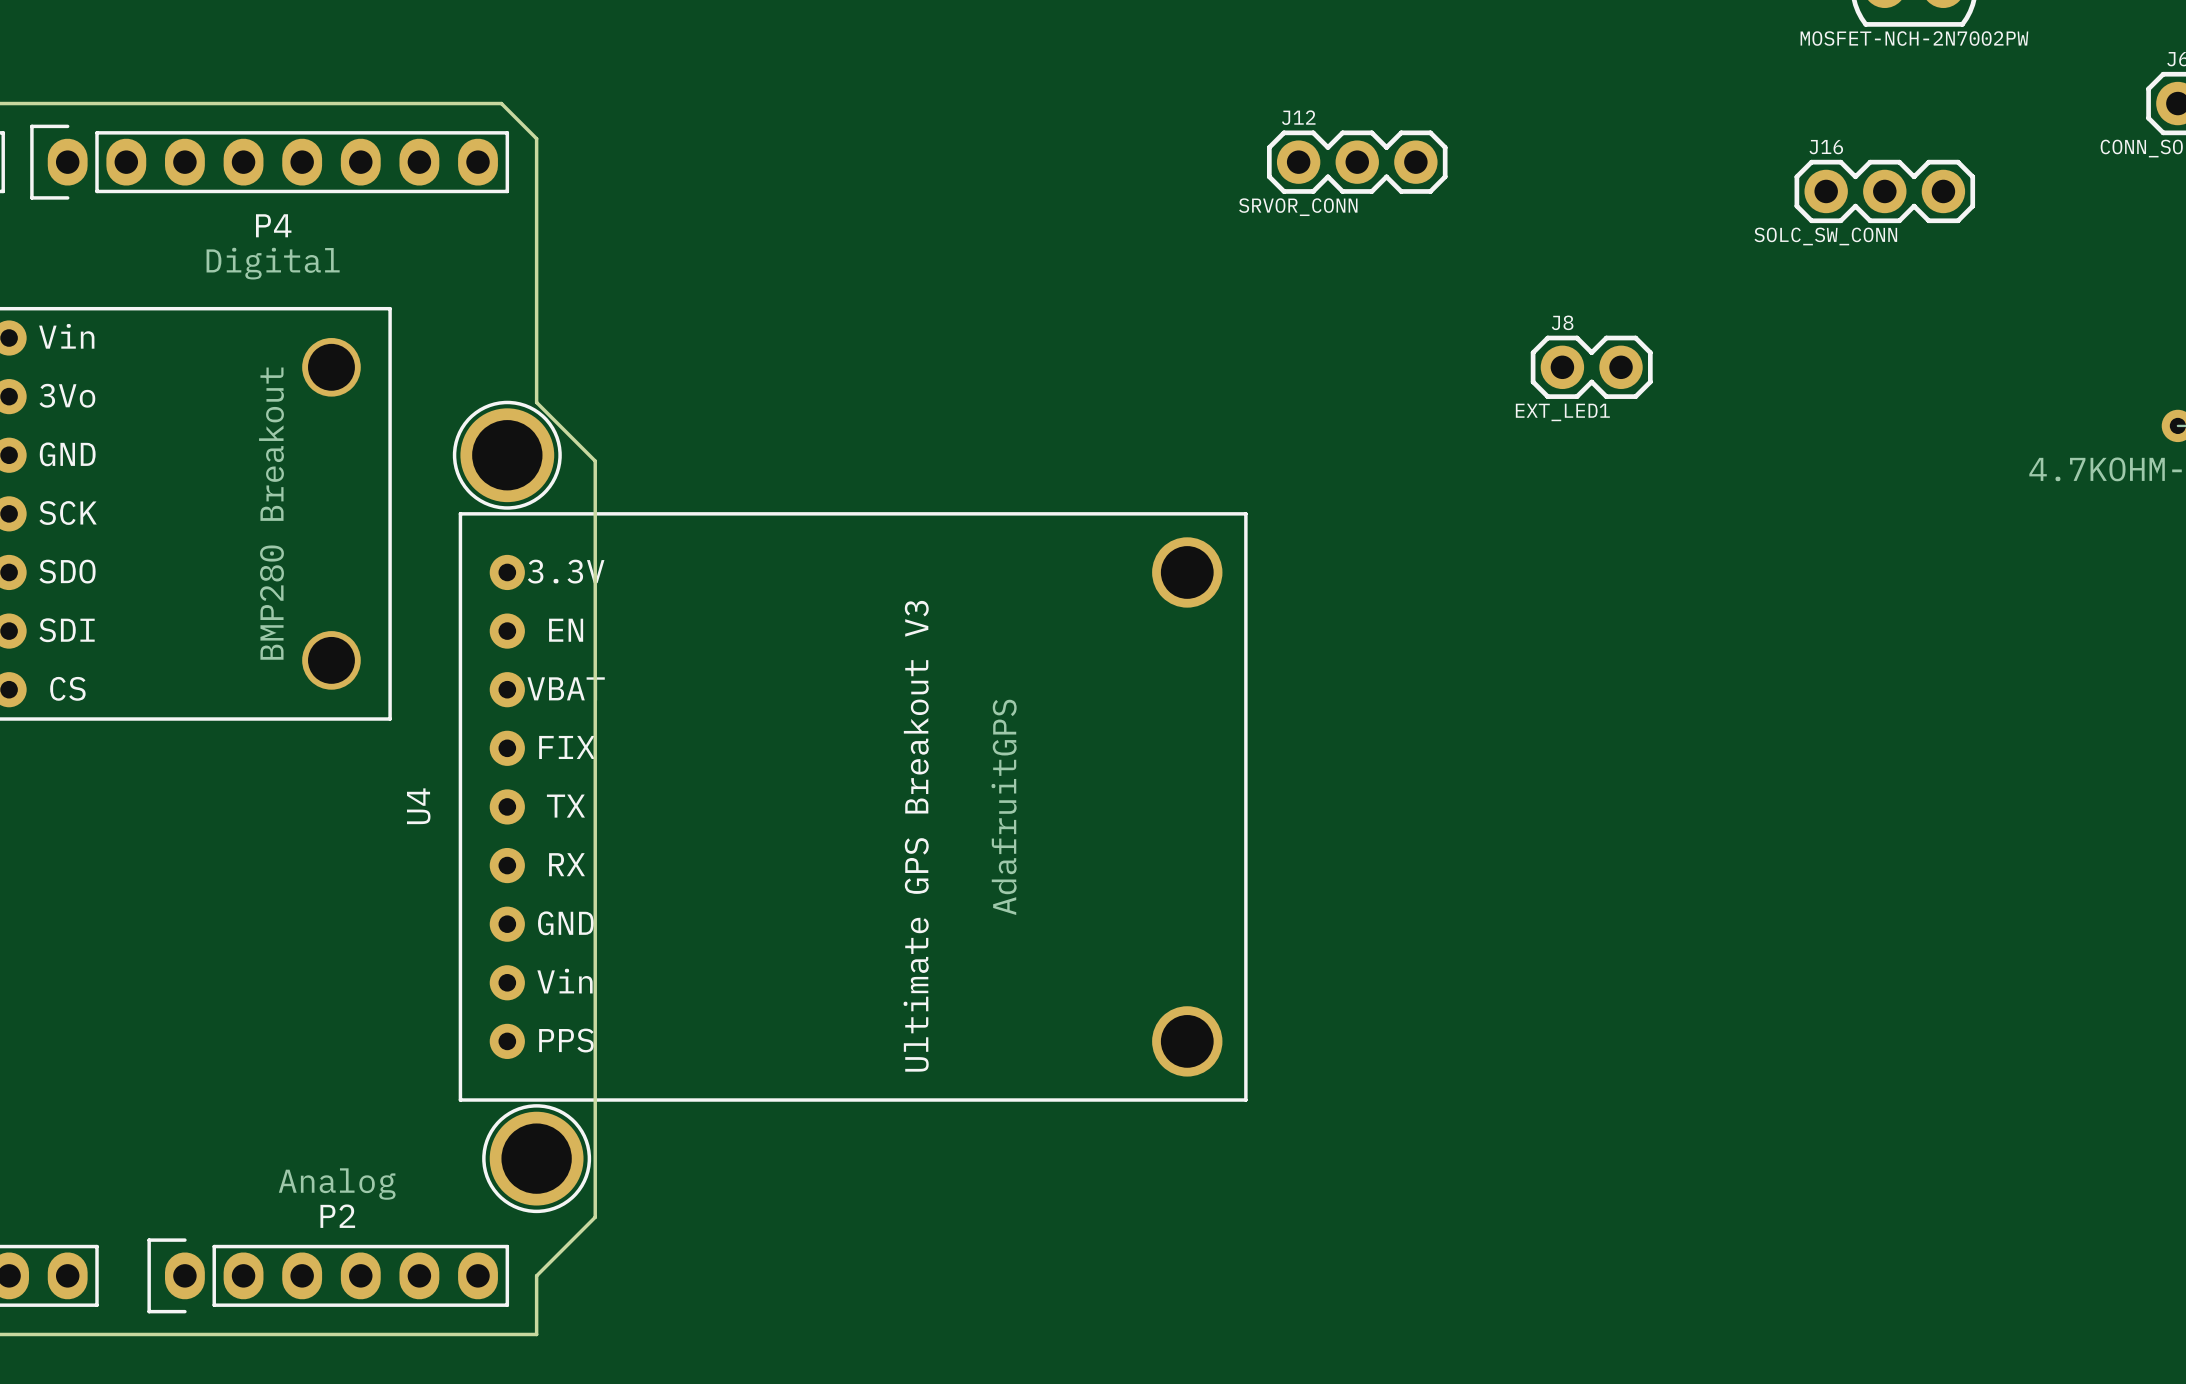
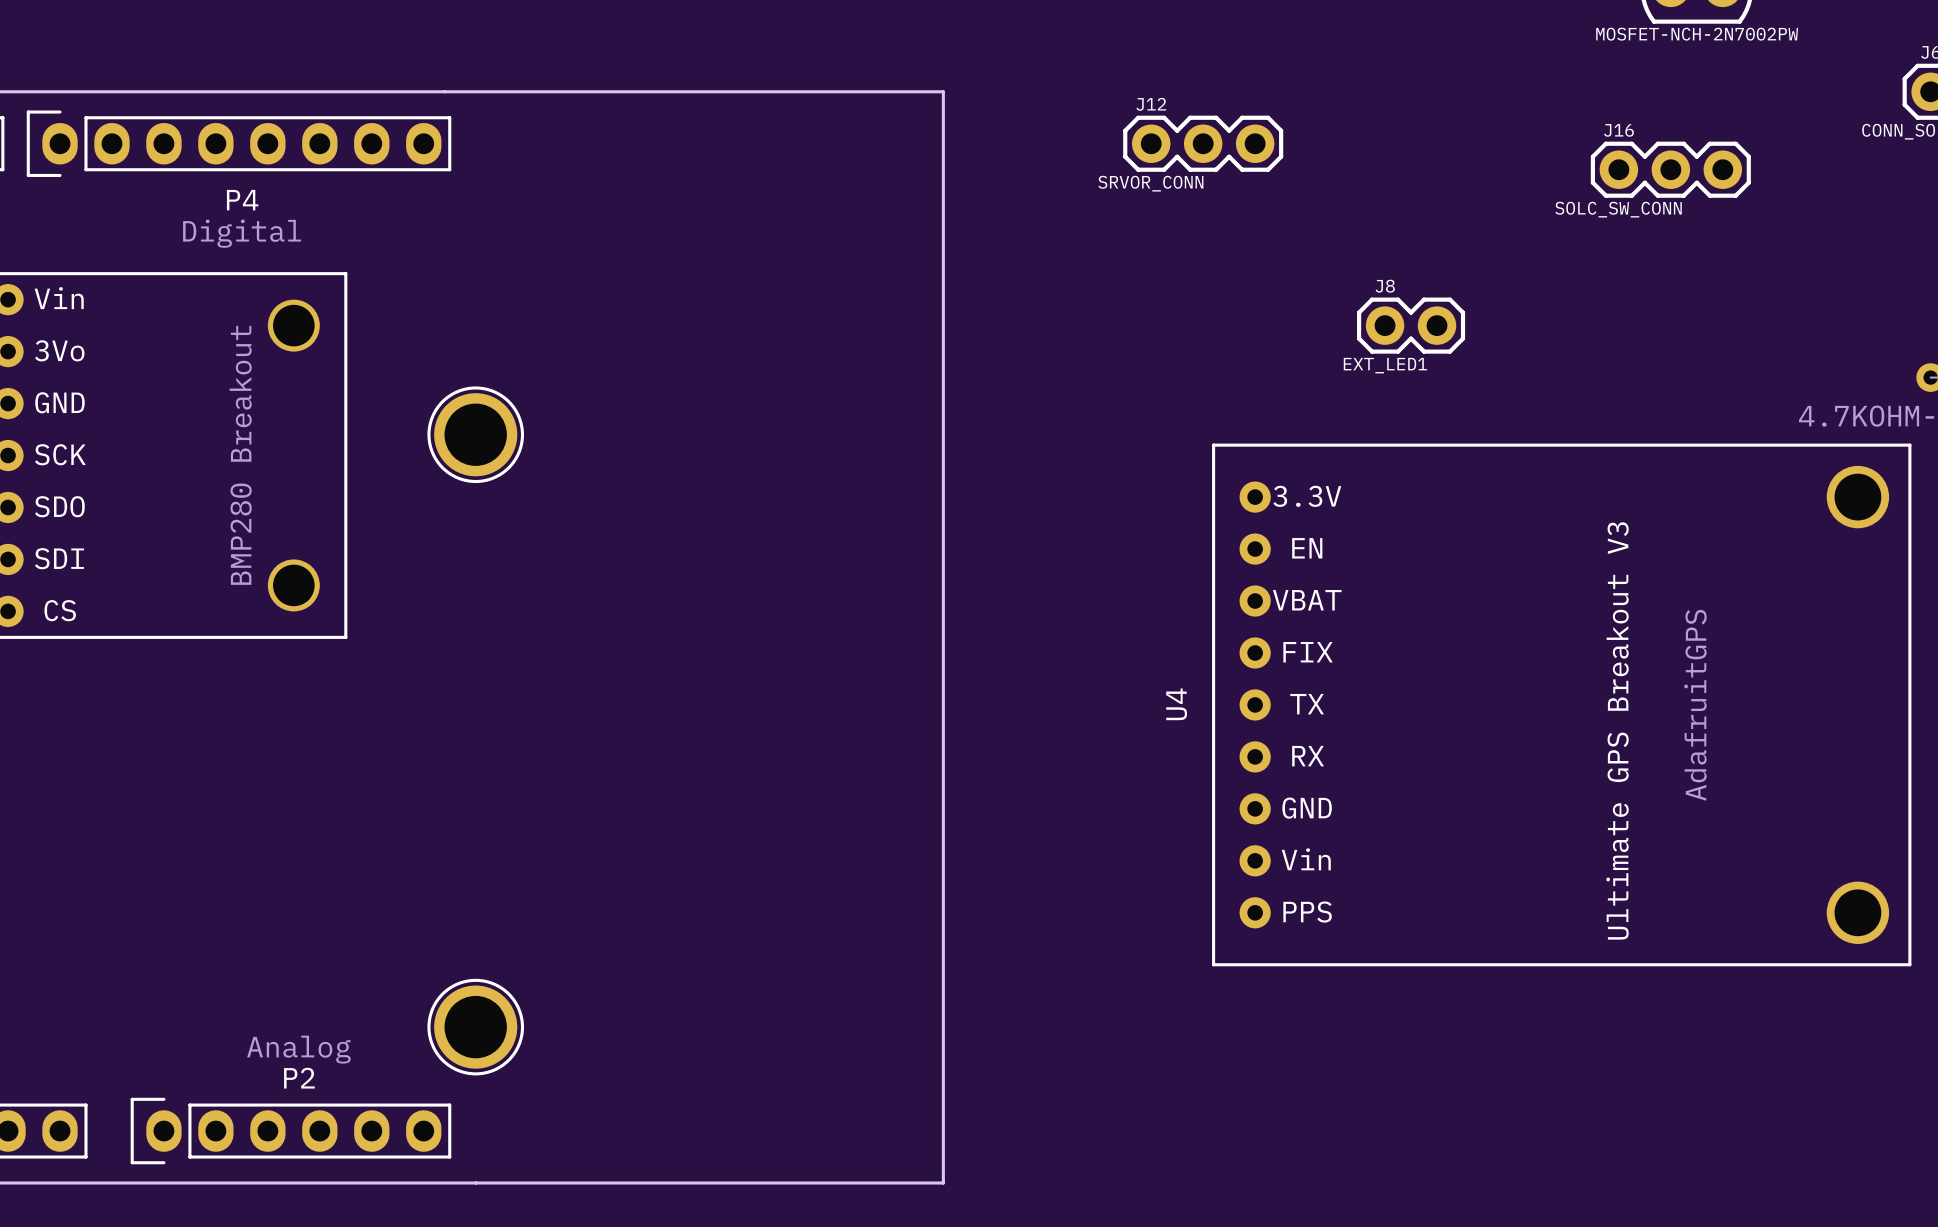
board edge: (501, 103) (536, 138) (536, 402) (595, 461) (595, 1217) (536, 1275) (536, 1334) -> (444, 91) (943, 91) (943, 1183) (475, 1183)
part position: (507, 455) -> (475, 434)
U4 position: (853, 806) -> (1561, 704)

